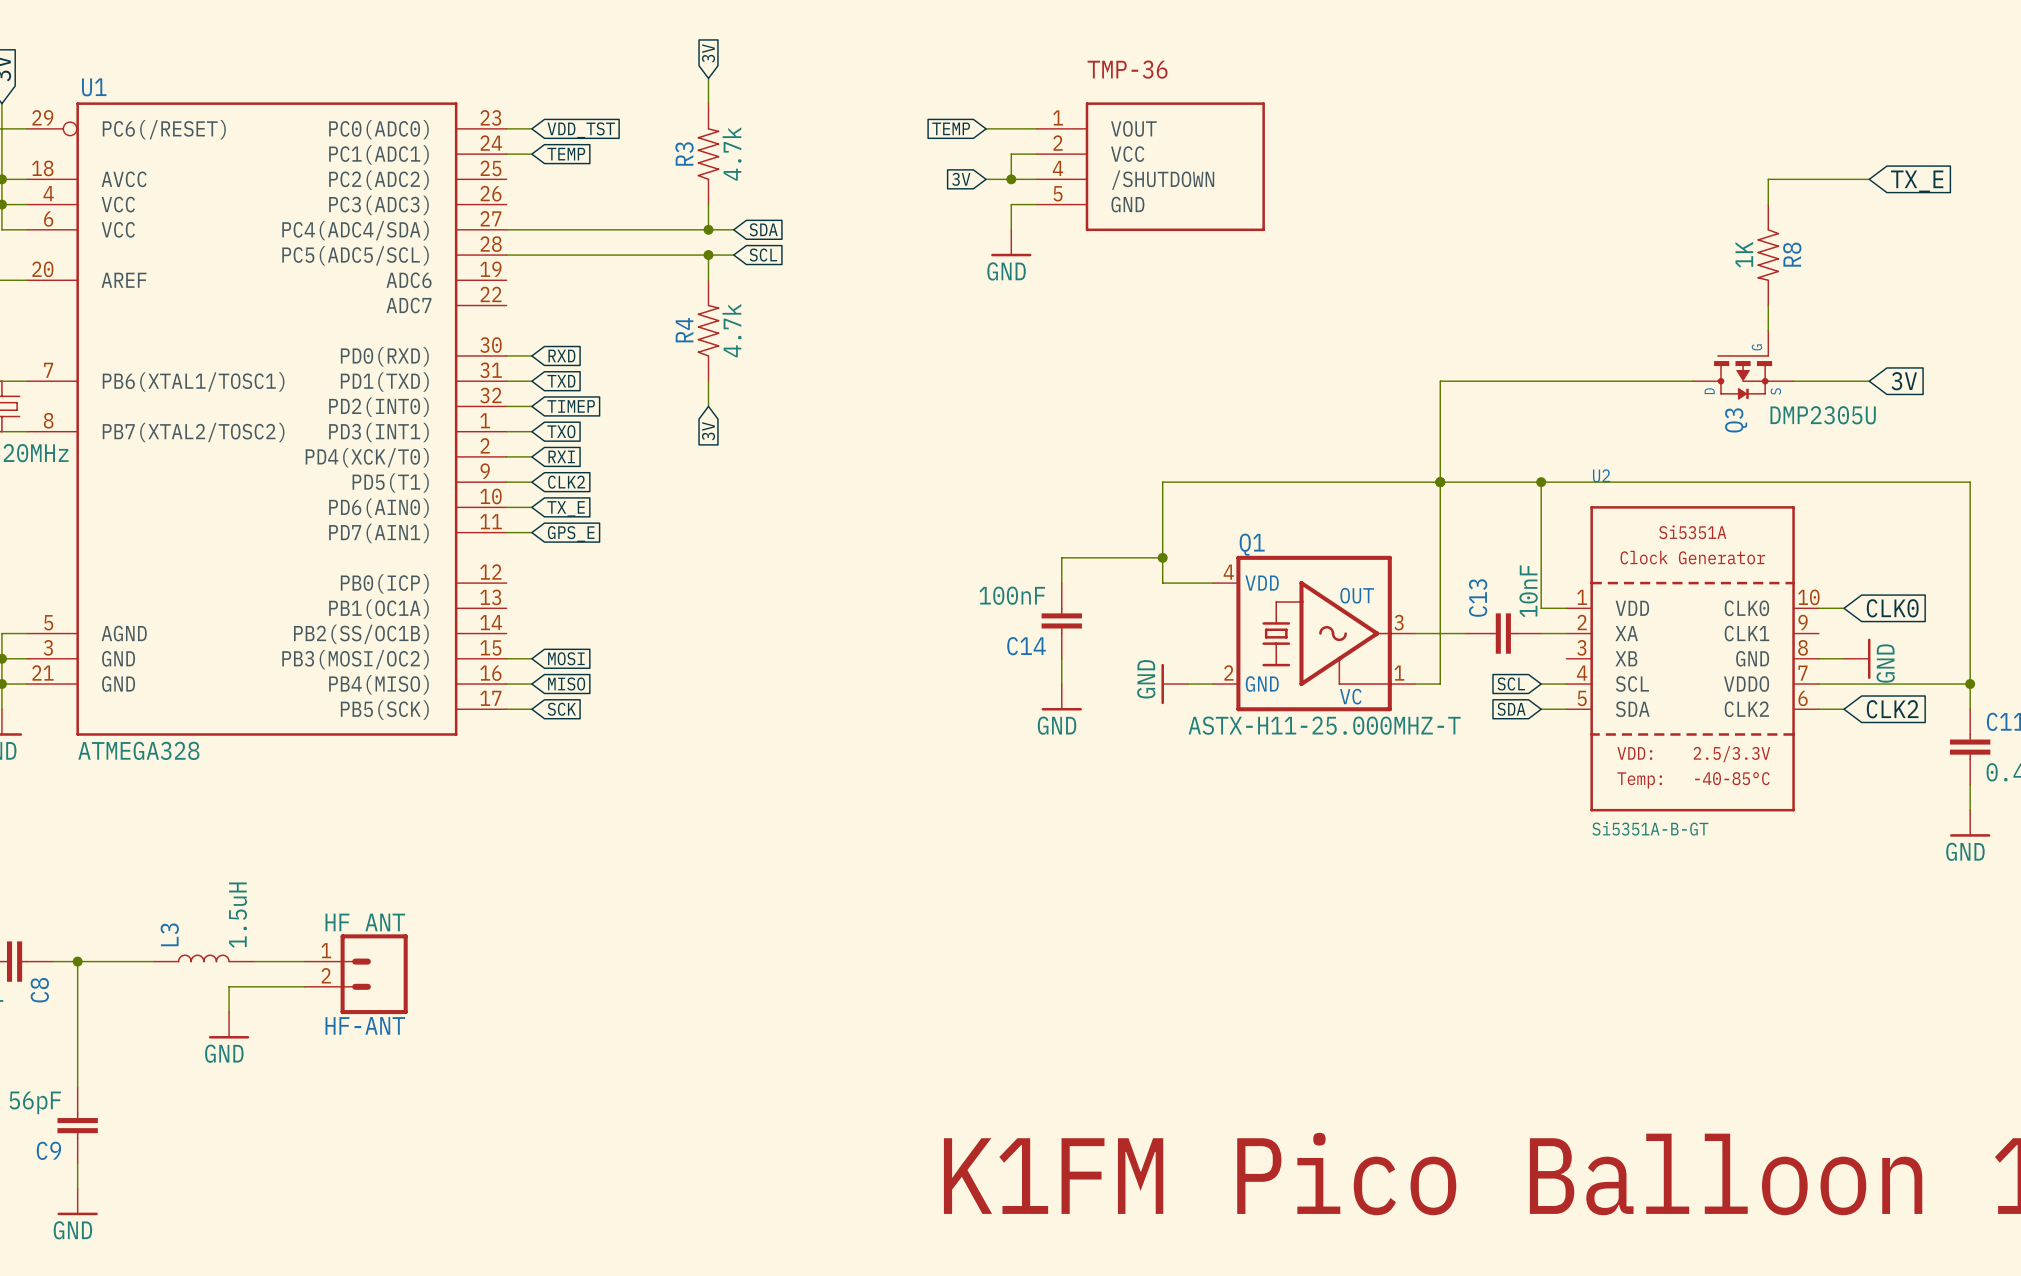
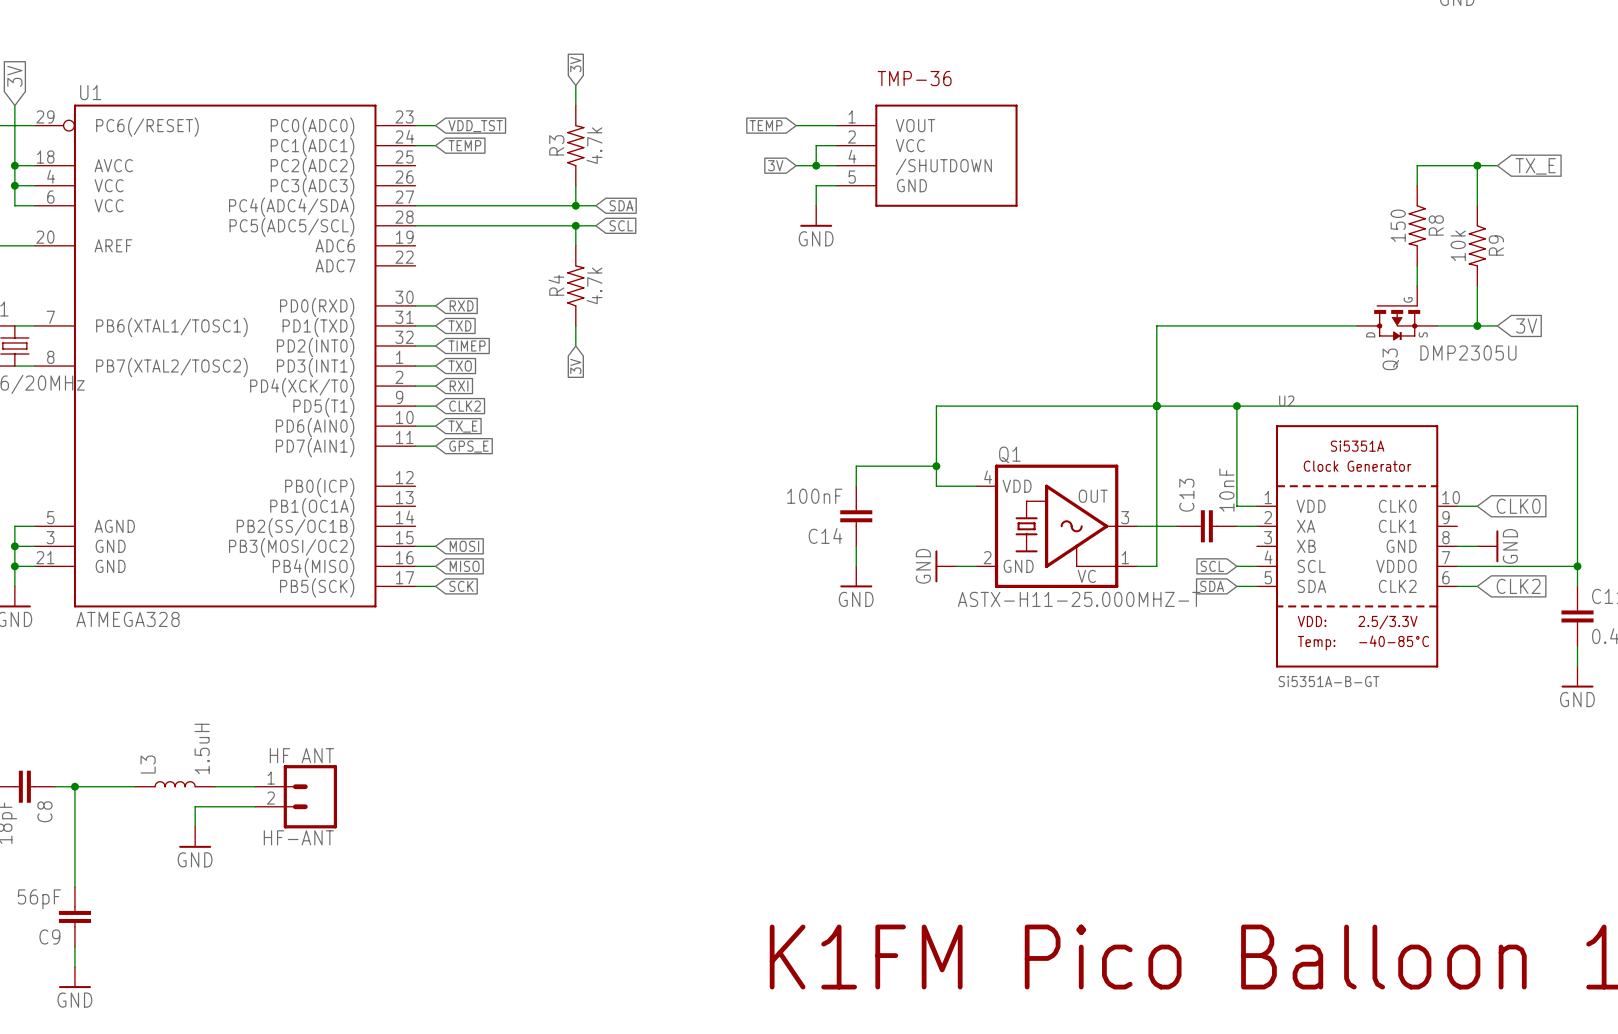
wire: none -> (1477, 165) (1477, 205)
junction: none -> (1477, 165)
R8 value: 1K (1744, 254) -> 150 (1398, 225)
R9: none -> 10k (1477, 245)
wire: none -> (1477, 285) (1477, 325)
junction: none -> (1477, 325)

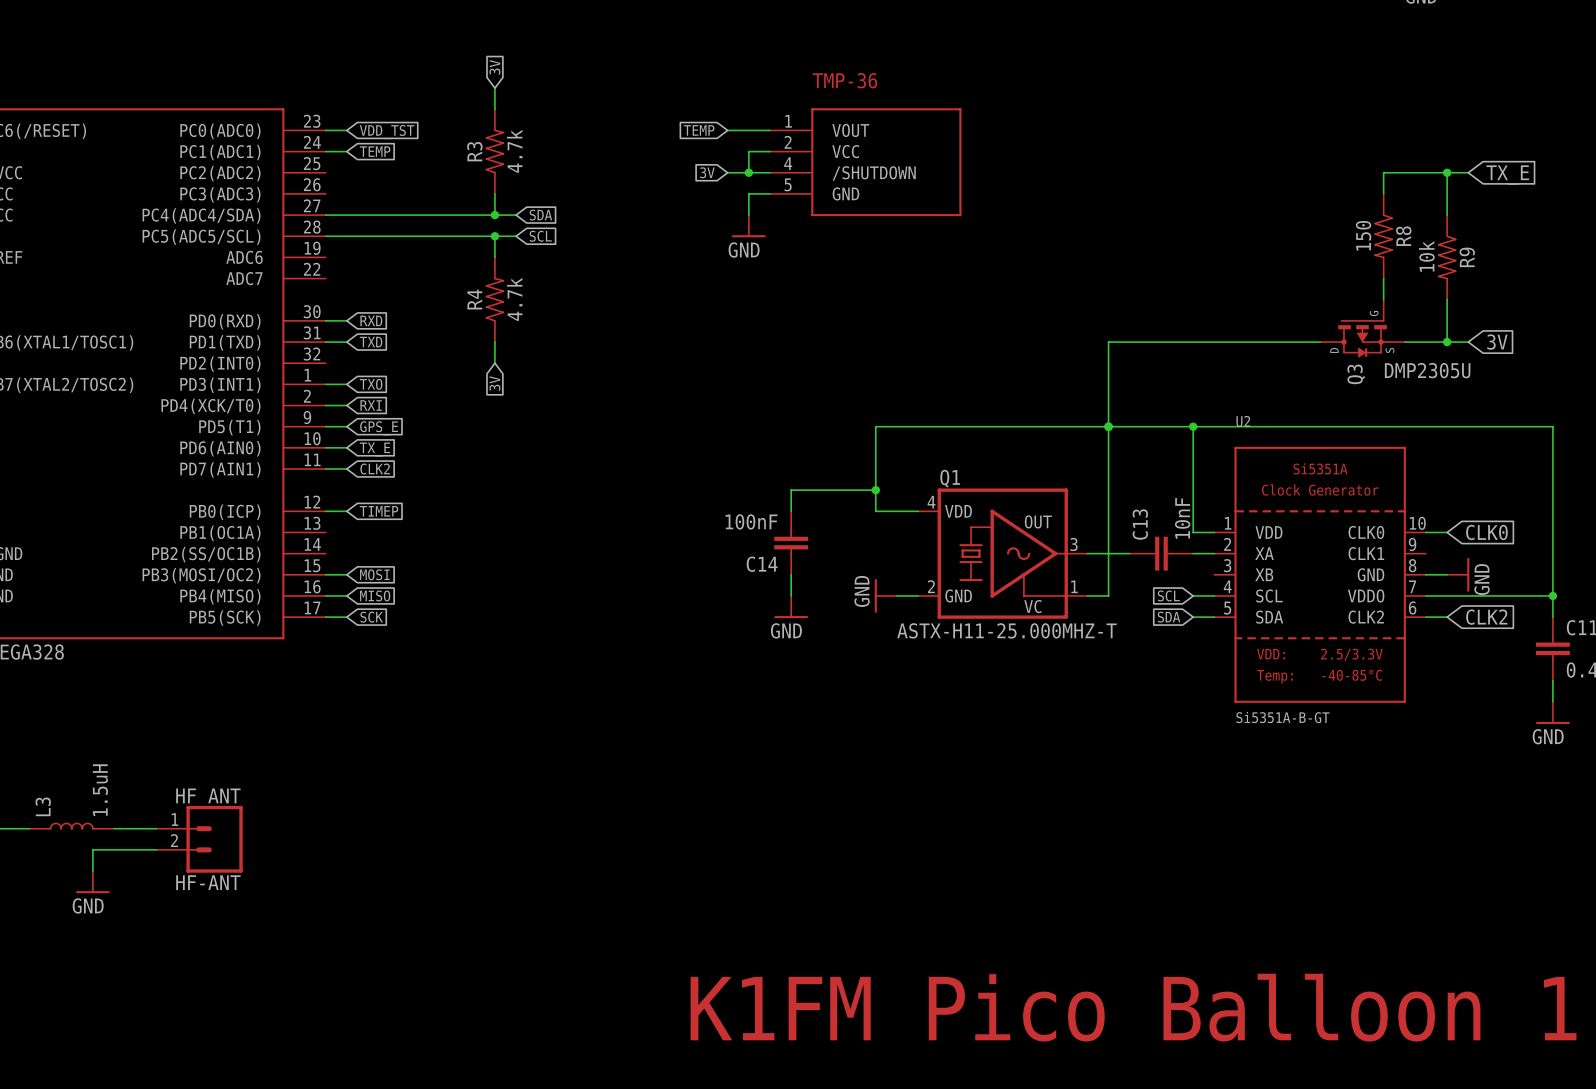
wire: (415, 345) (435, 345) -> (325, 511) (346, 511)
global label position: TIMEP (467, 345) -> TIMEP (379, 511)
global label: CLK2 (465, 406) -> GPS_E (379, 428)
global label: GPS_E (468, 446) -> CLK2 (375, 469)

